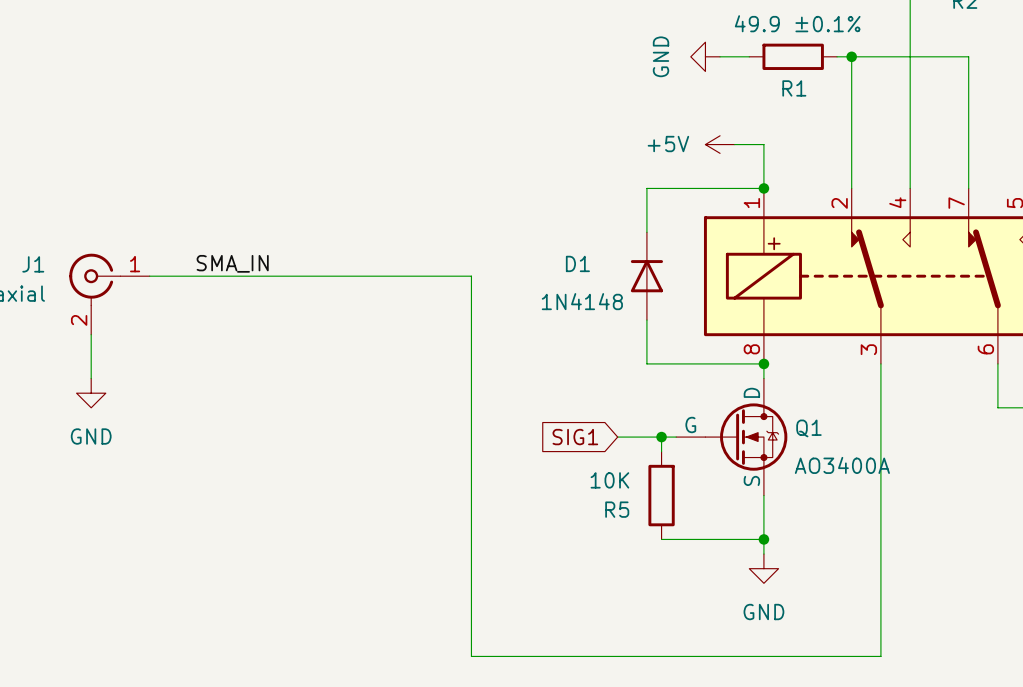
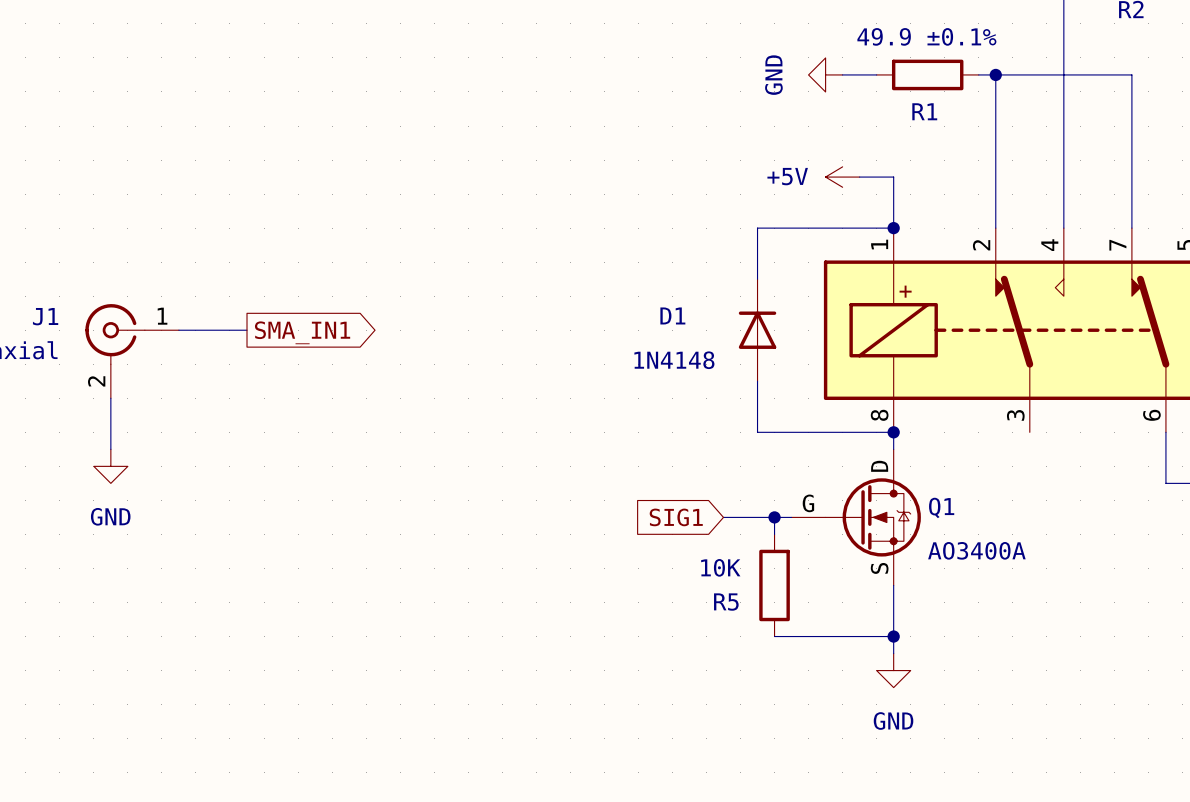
label: SMA_IN (232, 263) -> none
wire: (208, 276) (471, 276) (471, 656) (880, 656) (880, 363) -> none
global label: none -> SMA_IN1 (302, 332)

